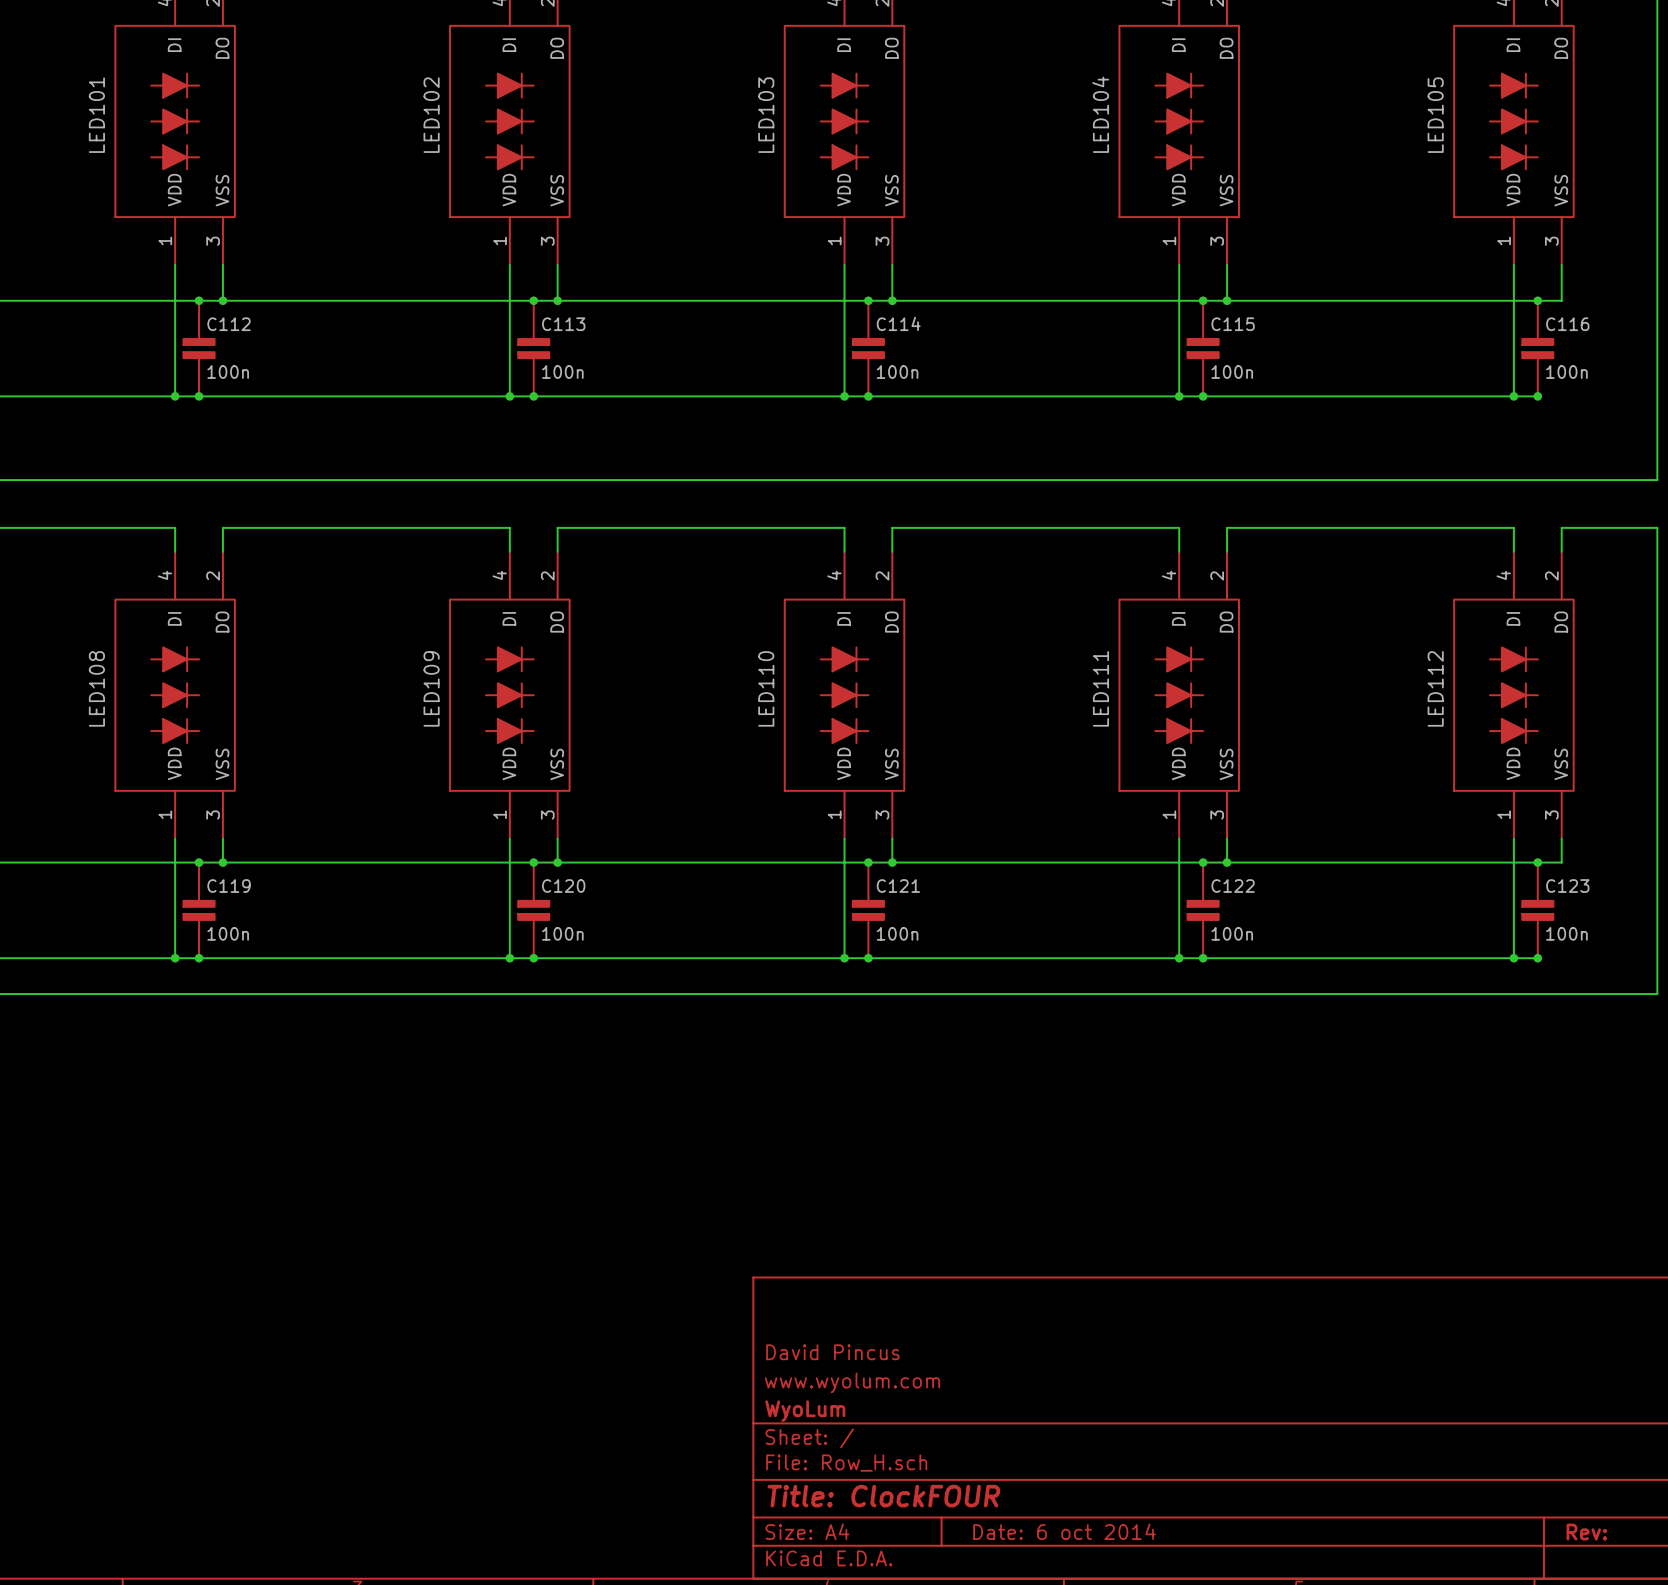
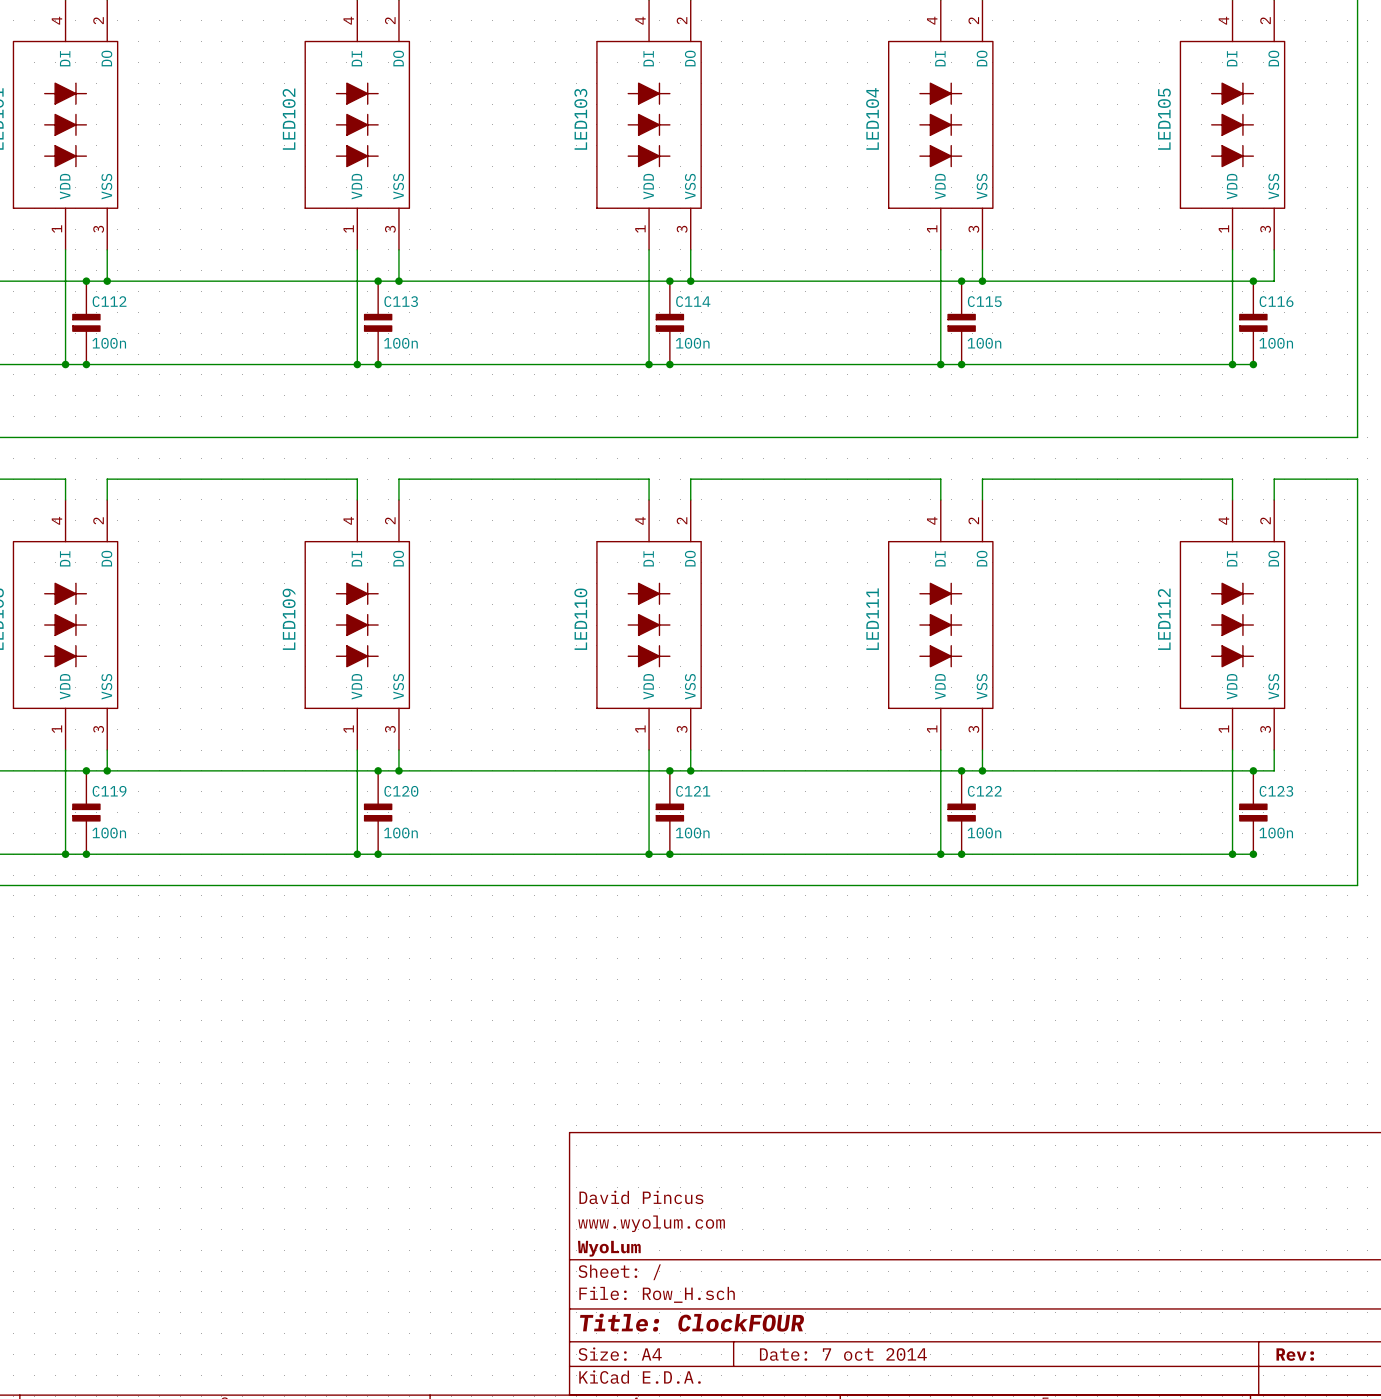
title block: Date: 6 oct 2014 (1064, 1531) -> Date: 7 oct 2014 (843, 1354)

